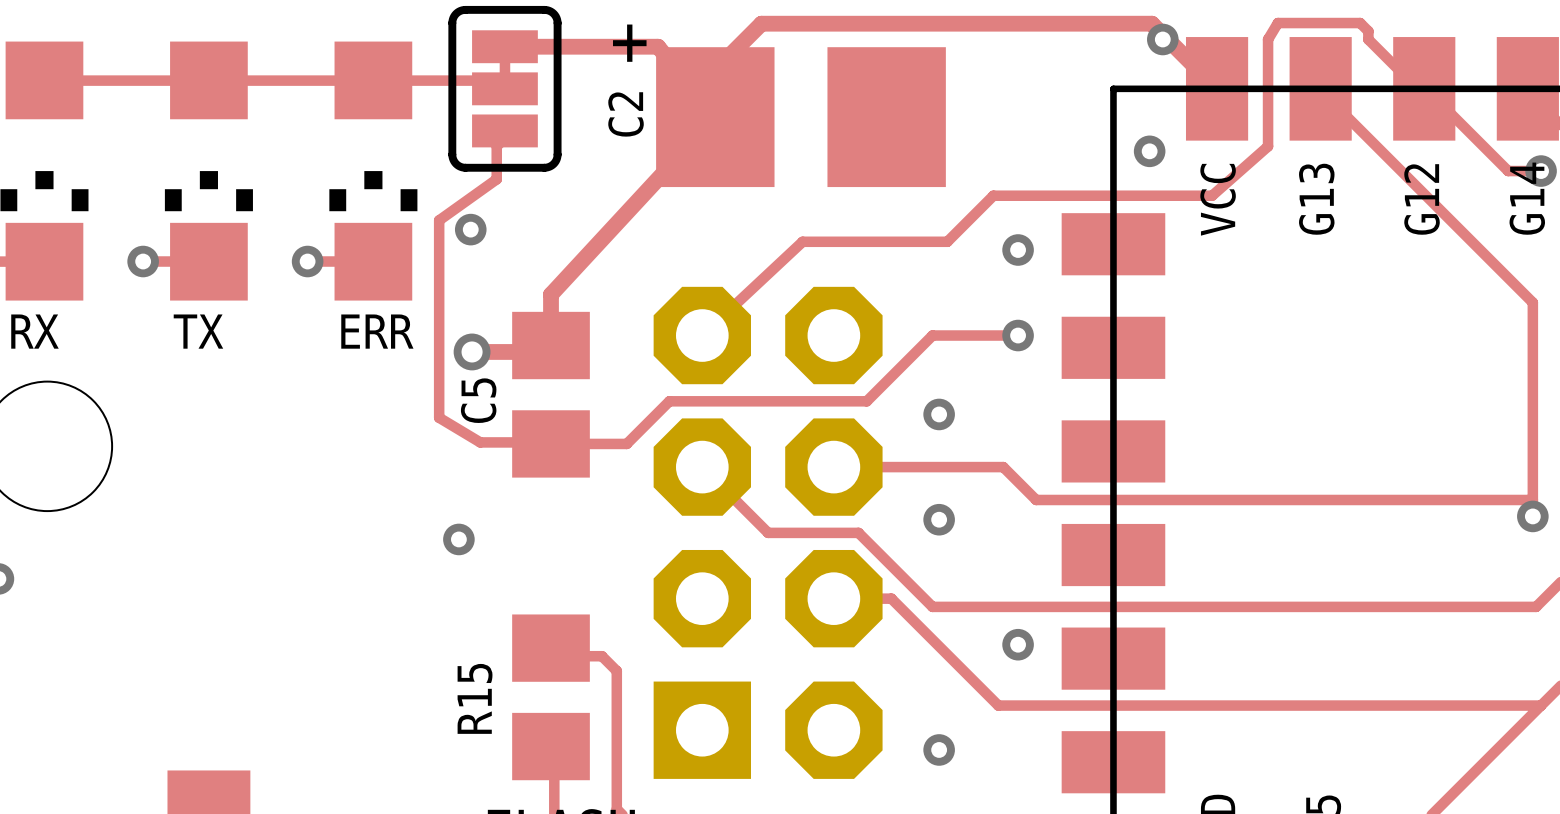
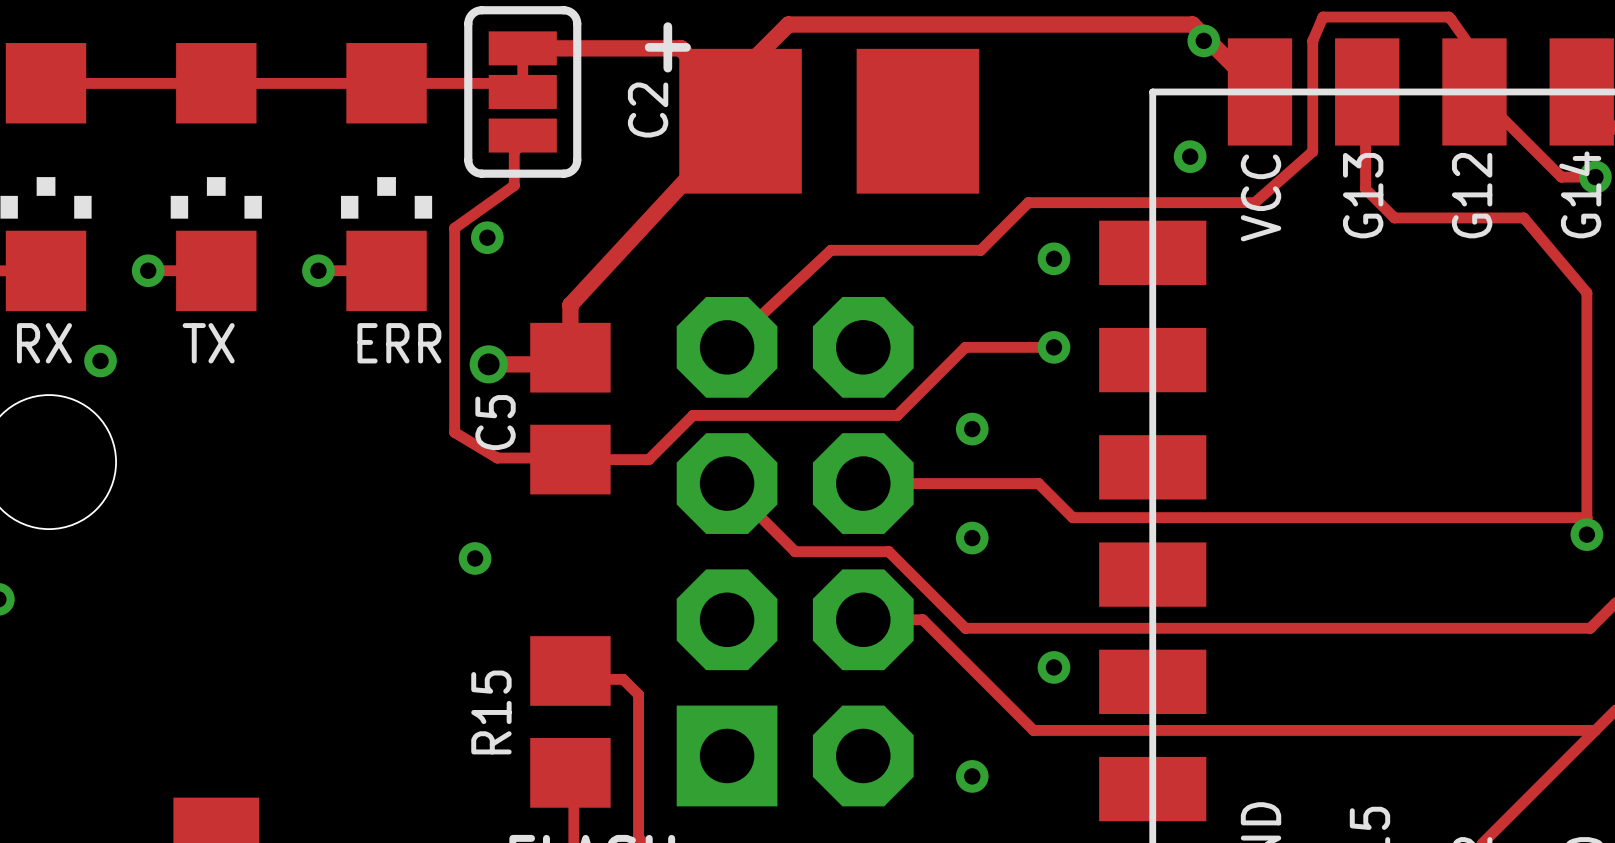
track: (1268, 39) (1277, 23) (1360, 23) (1368, 31) (1368, 39) (1417, 88) -> (1312, 40) (1322, 17) (1448, 17) (1471, 47) (1467, 91)
track: (1319, 88) (1532, 302) -> (1365, 91) (1365, 189) (1394, 217) (1523, 217) (1586, 292) (1586, 313)
via: none -> (100, 360)

